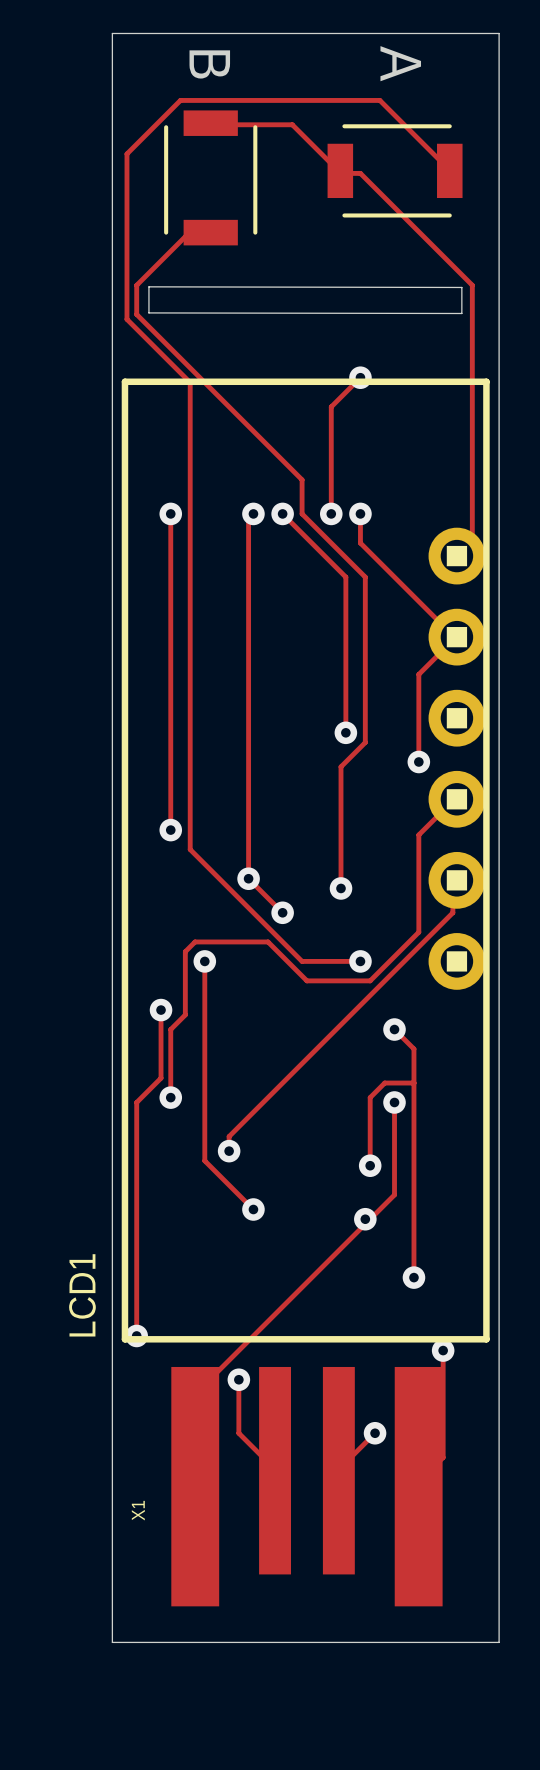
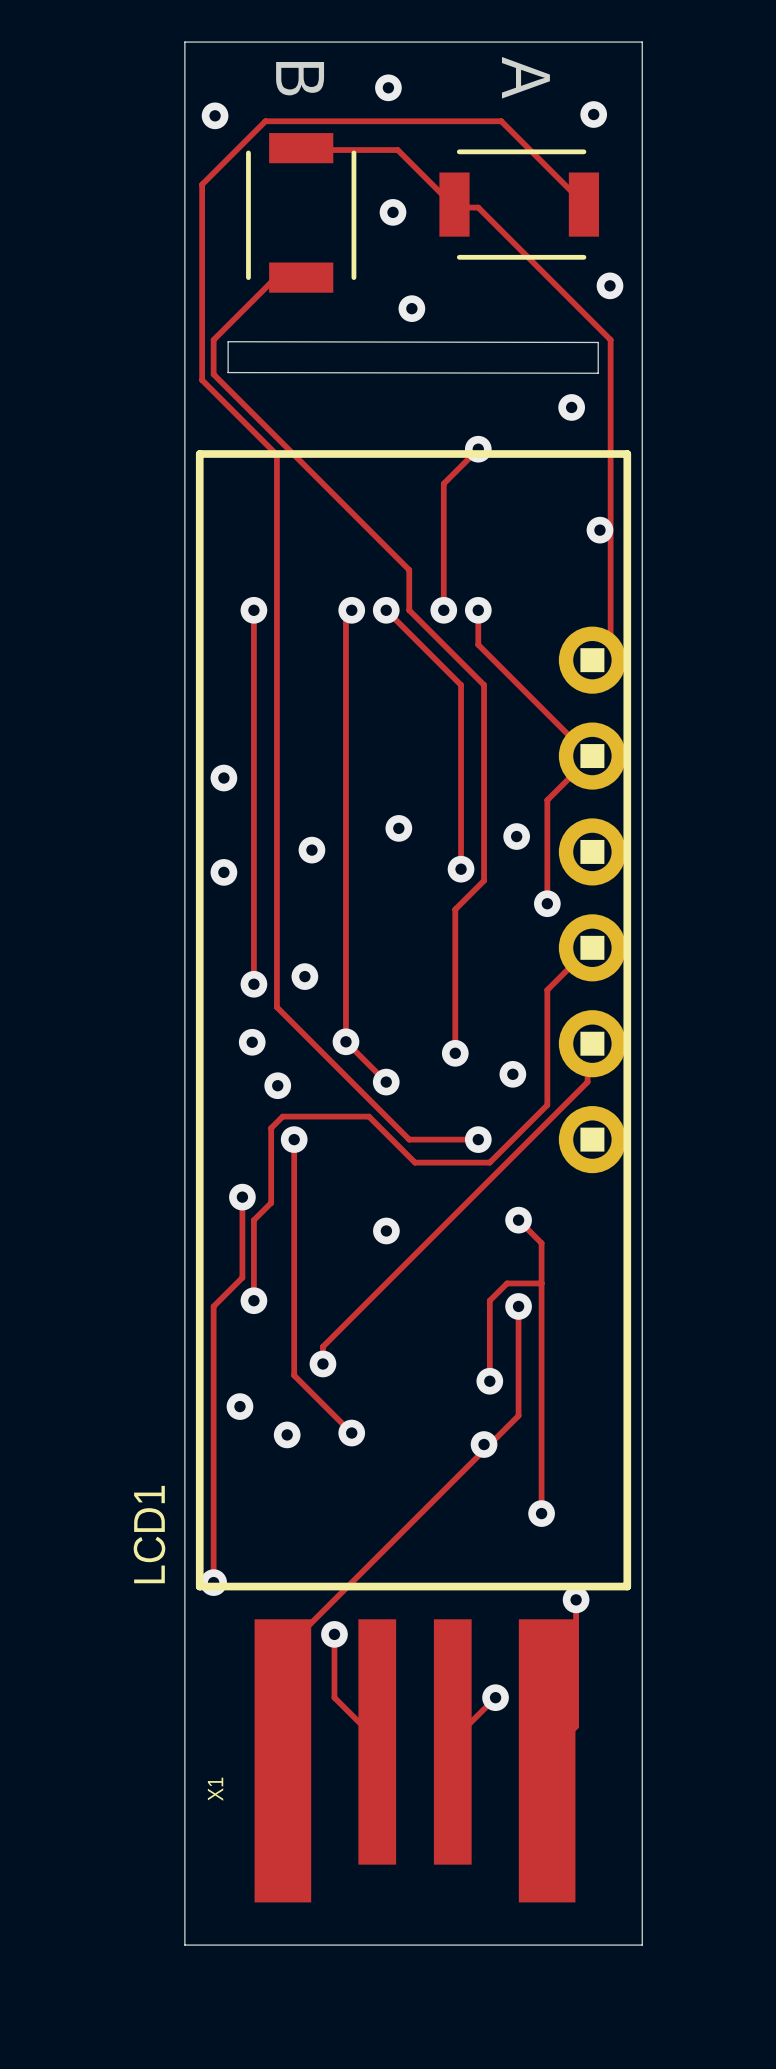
via: none -> (388, 87)
via: none -> (593, 114)
via: none -> (215, 115)
via: none -> (393, 212)
via: none -> (609, 285)
via: none -> (411, 308)
via: none -> (571, 407)
via: none -> (599, 530)
via: none -> (223, 778)
via: none -> (398, 828)
via: none -> (516, 836)
via: none -> (311, 850)
via: none -> (223, 872)
via: none -> (304, 976)
via: none -> (252, 1042)
via: none -> (512, 1074)
via: none -> (277, 1085)
via: none -> (386, 1230)
via: none -> (239, 1406)
via: none -> (287, 1434)

